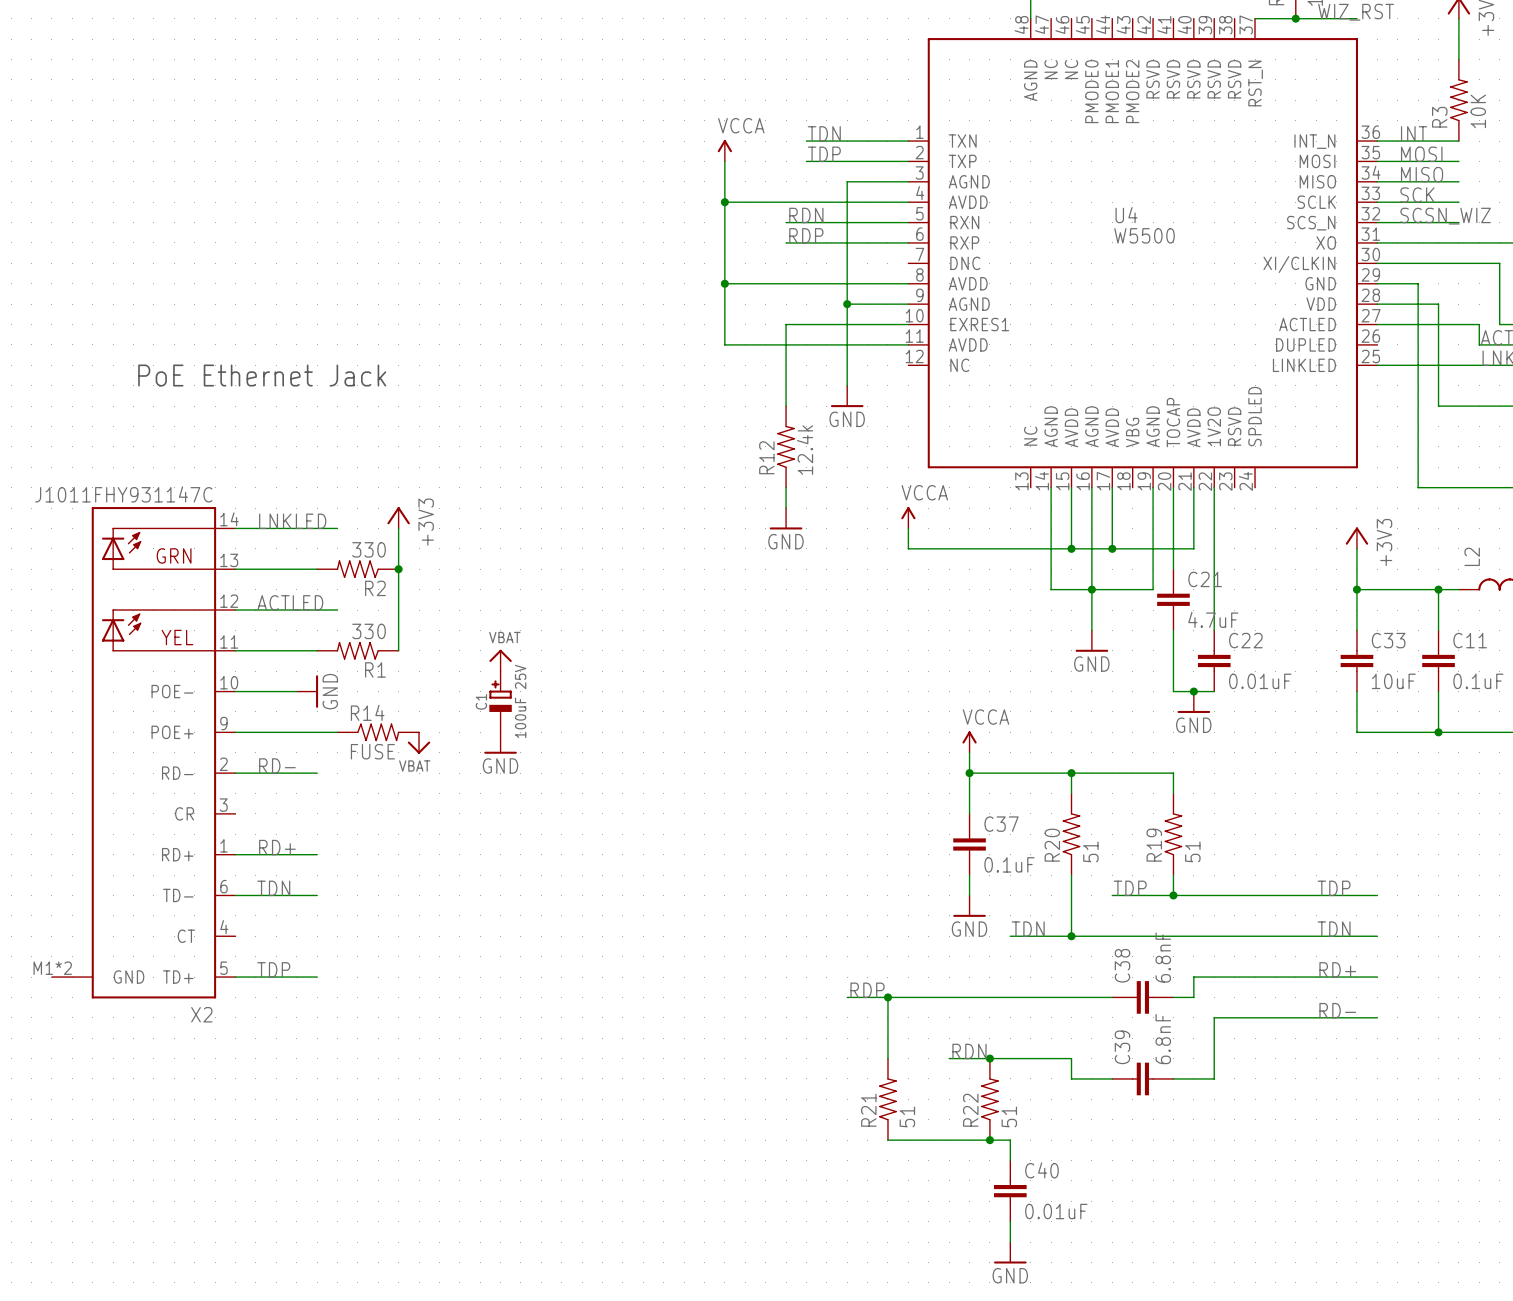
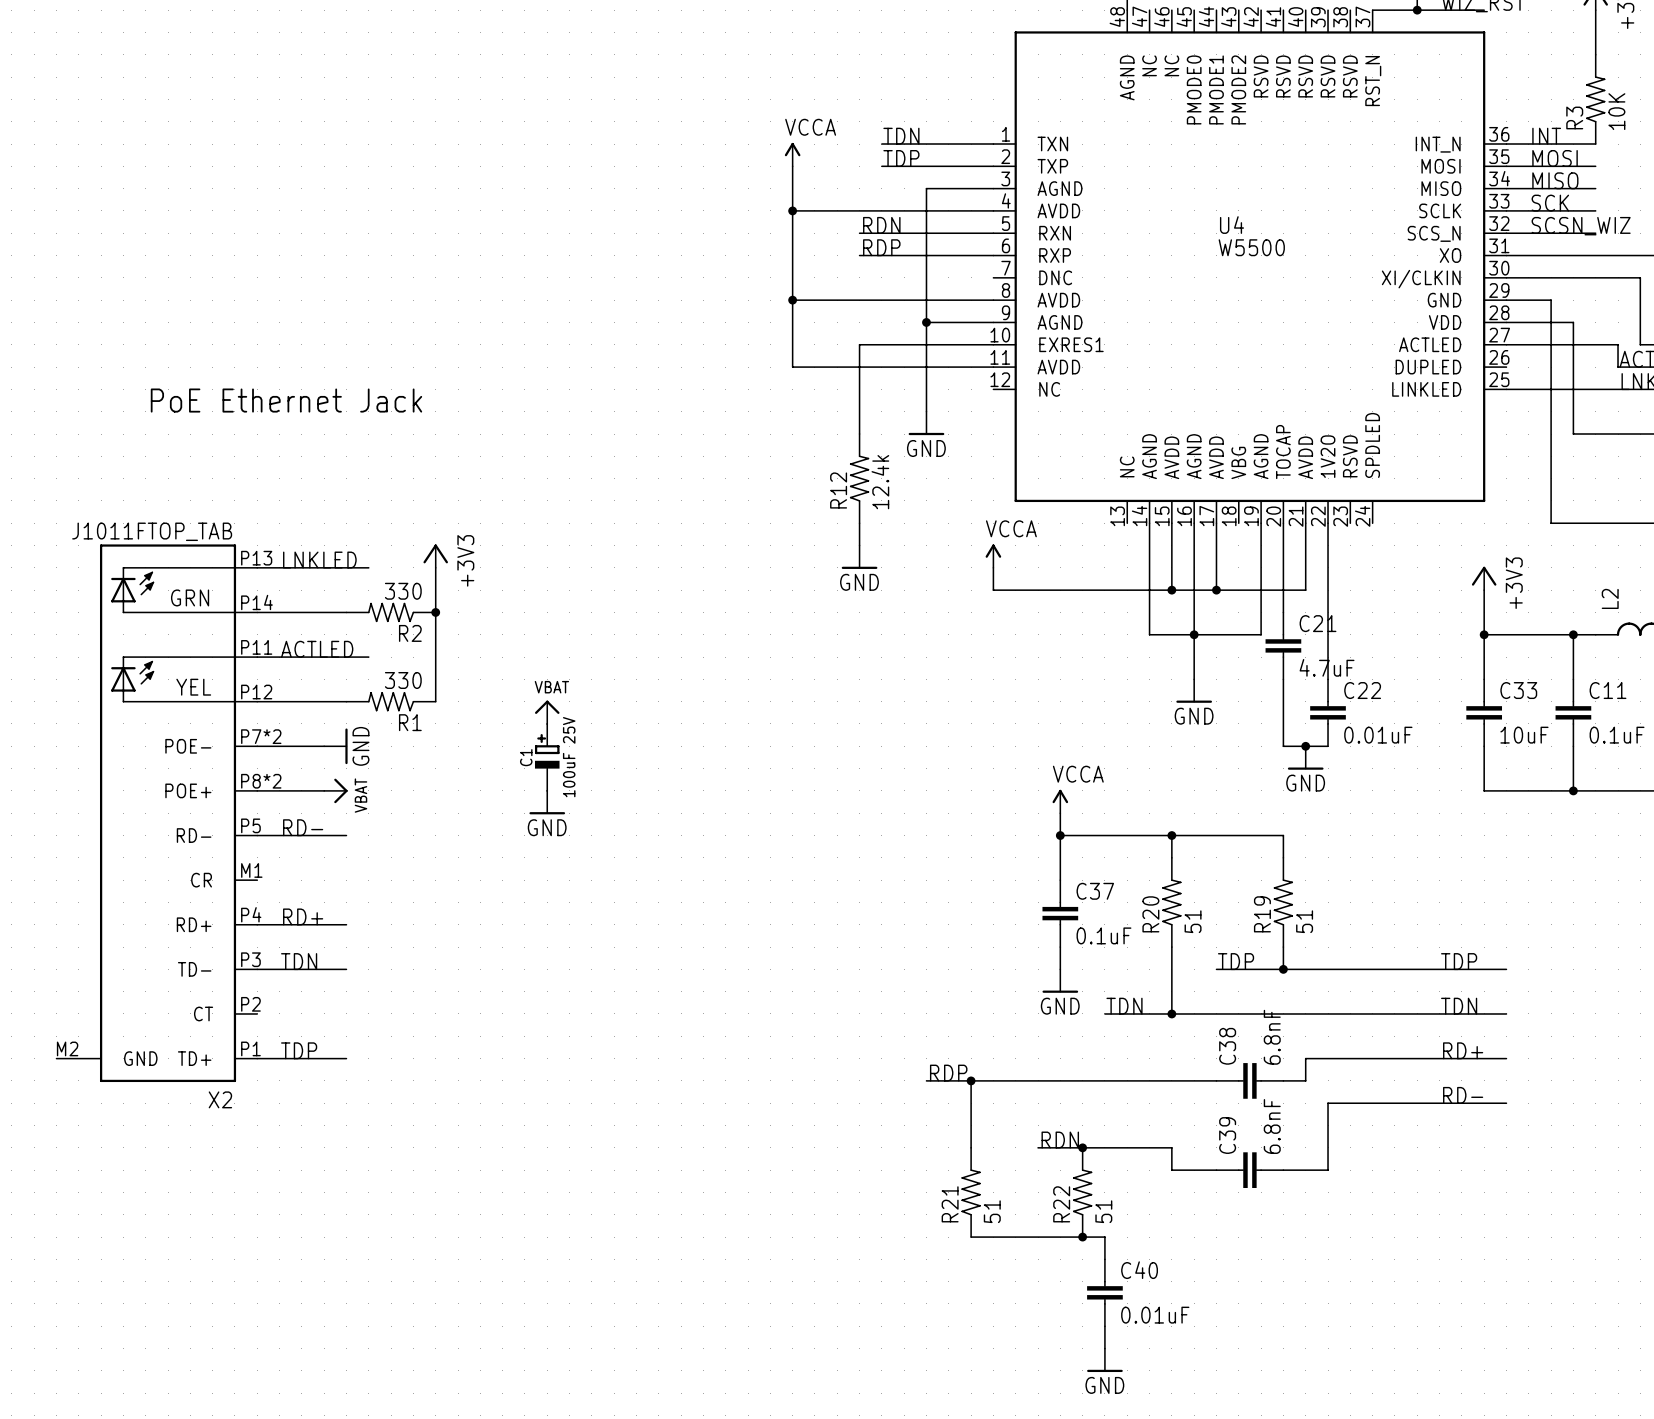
X2 value: J1011FHY931147C (123, 494) -> J1011FTOP_TAB (152, 531)
X2 symbol: [51, 507, 236, 999] -> [56, 544, 258, 1083]
R14: FUSE (378, 732) -> none
power symbol position: VBAT (419, 743) -> VBAT (335, 790)
power symbol rotation: 0° (419, 747) -> 90° counterclockwise (340, 790)

